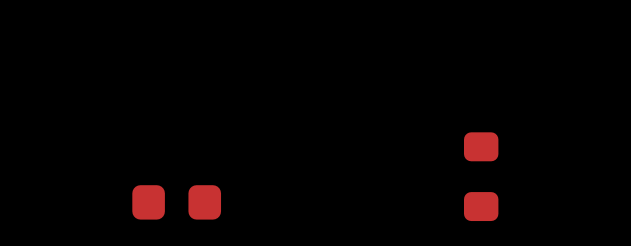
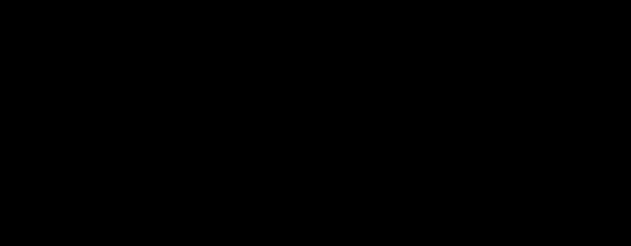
part: (481, 176) -> none
part: (176, 202) -> none

